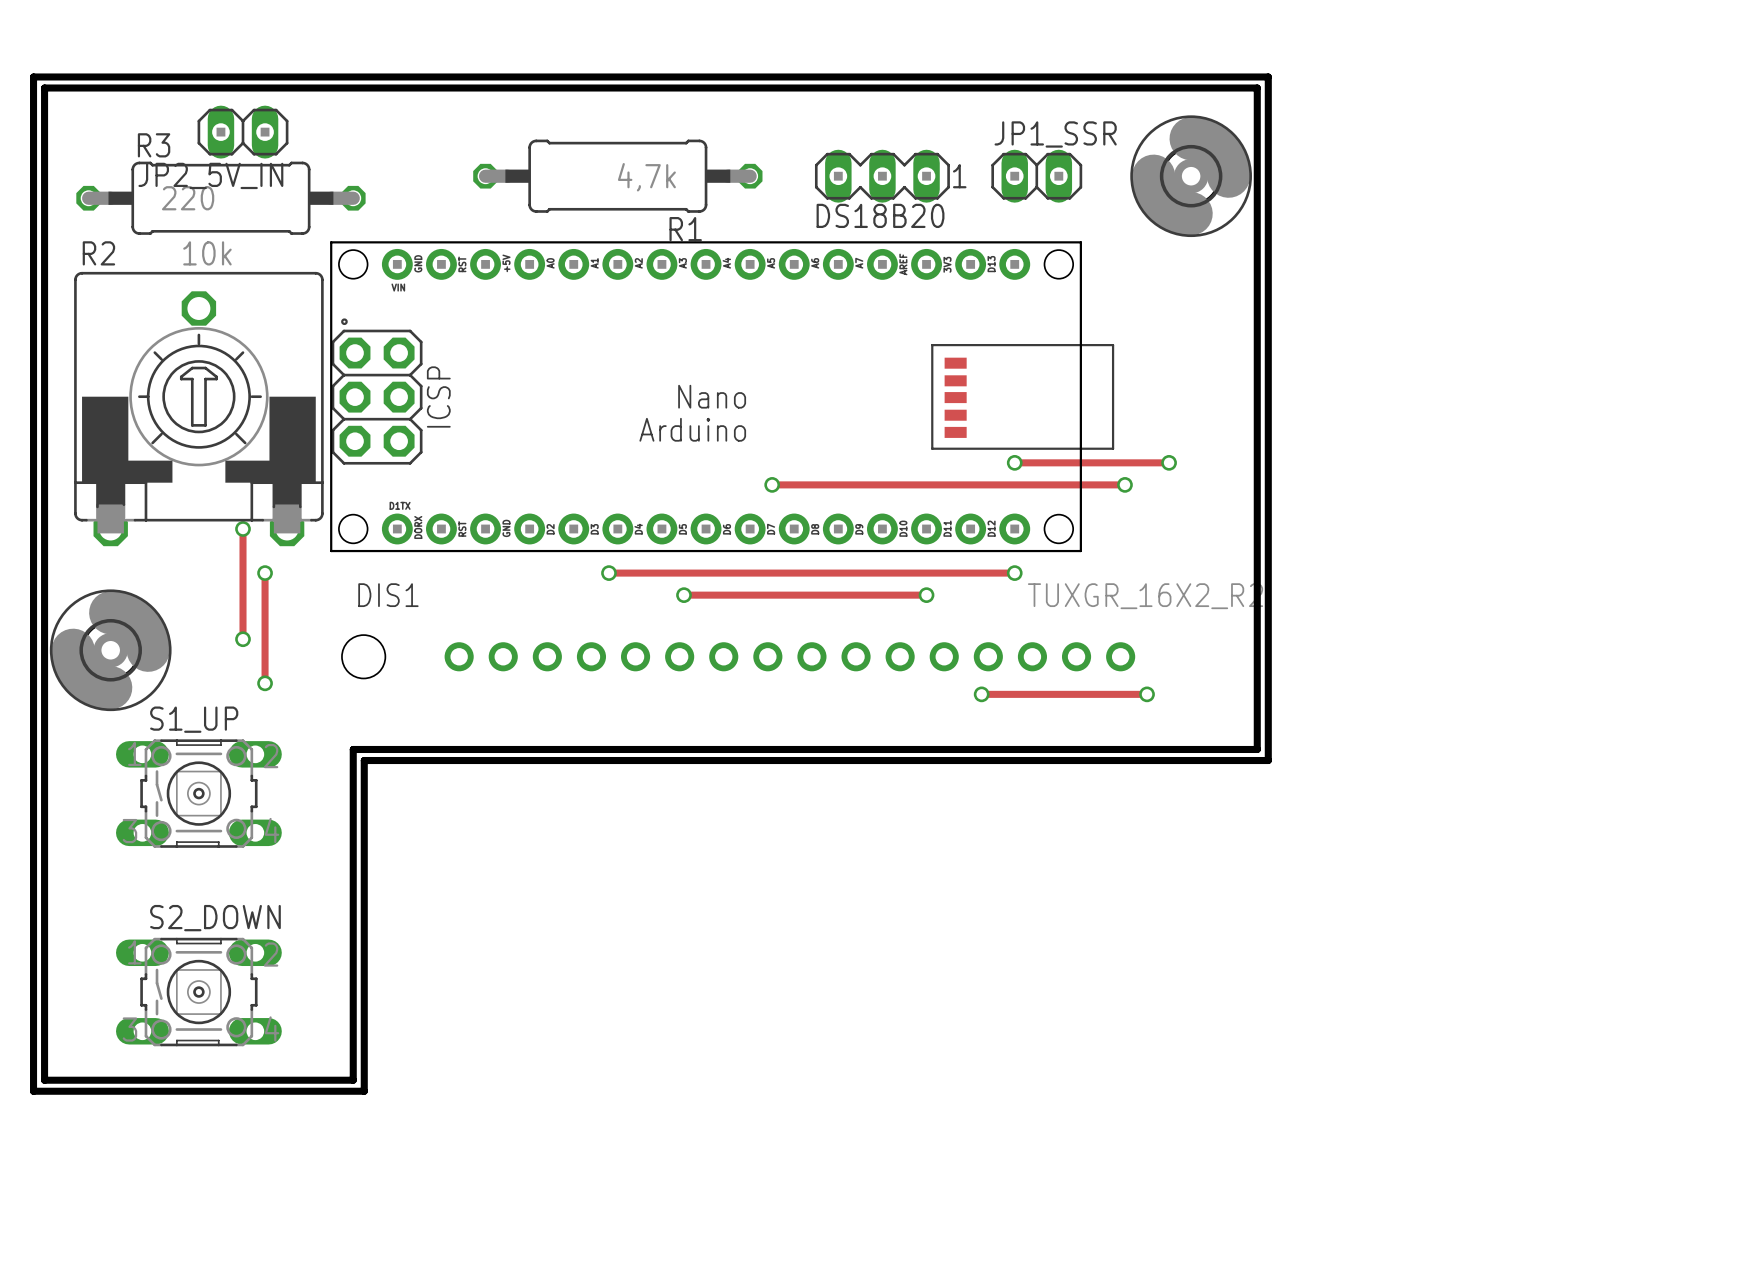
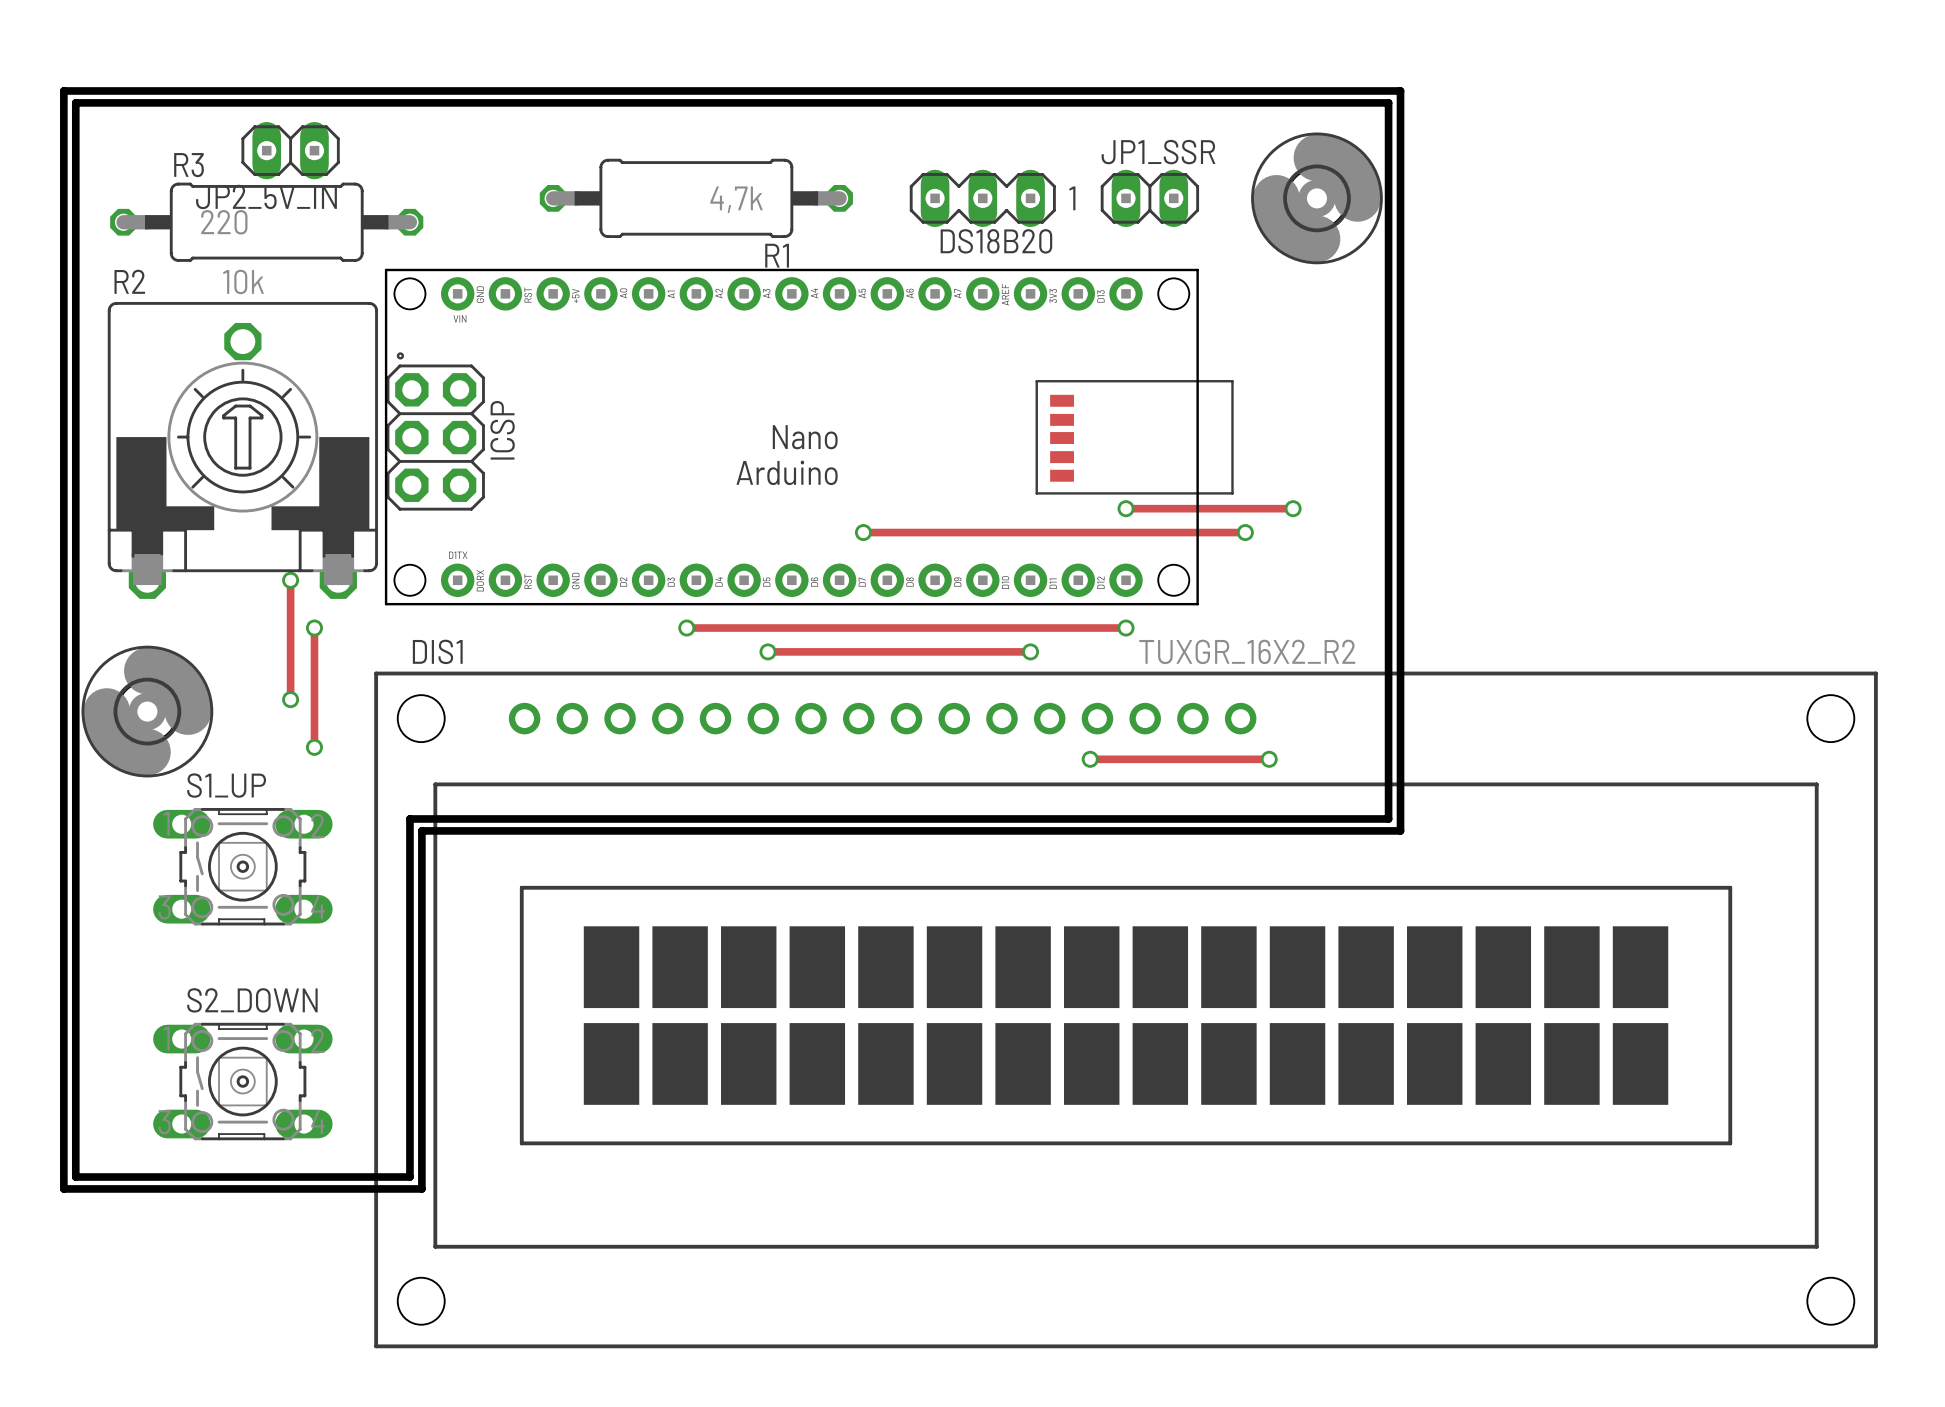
DIS1 footprint: [341, 635, 1136, 679] -> [374, 671, 1878, 1349]

